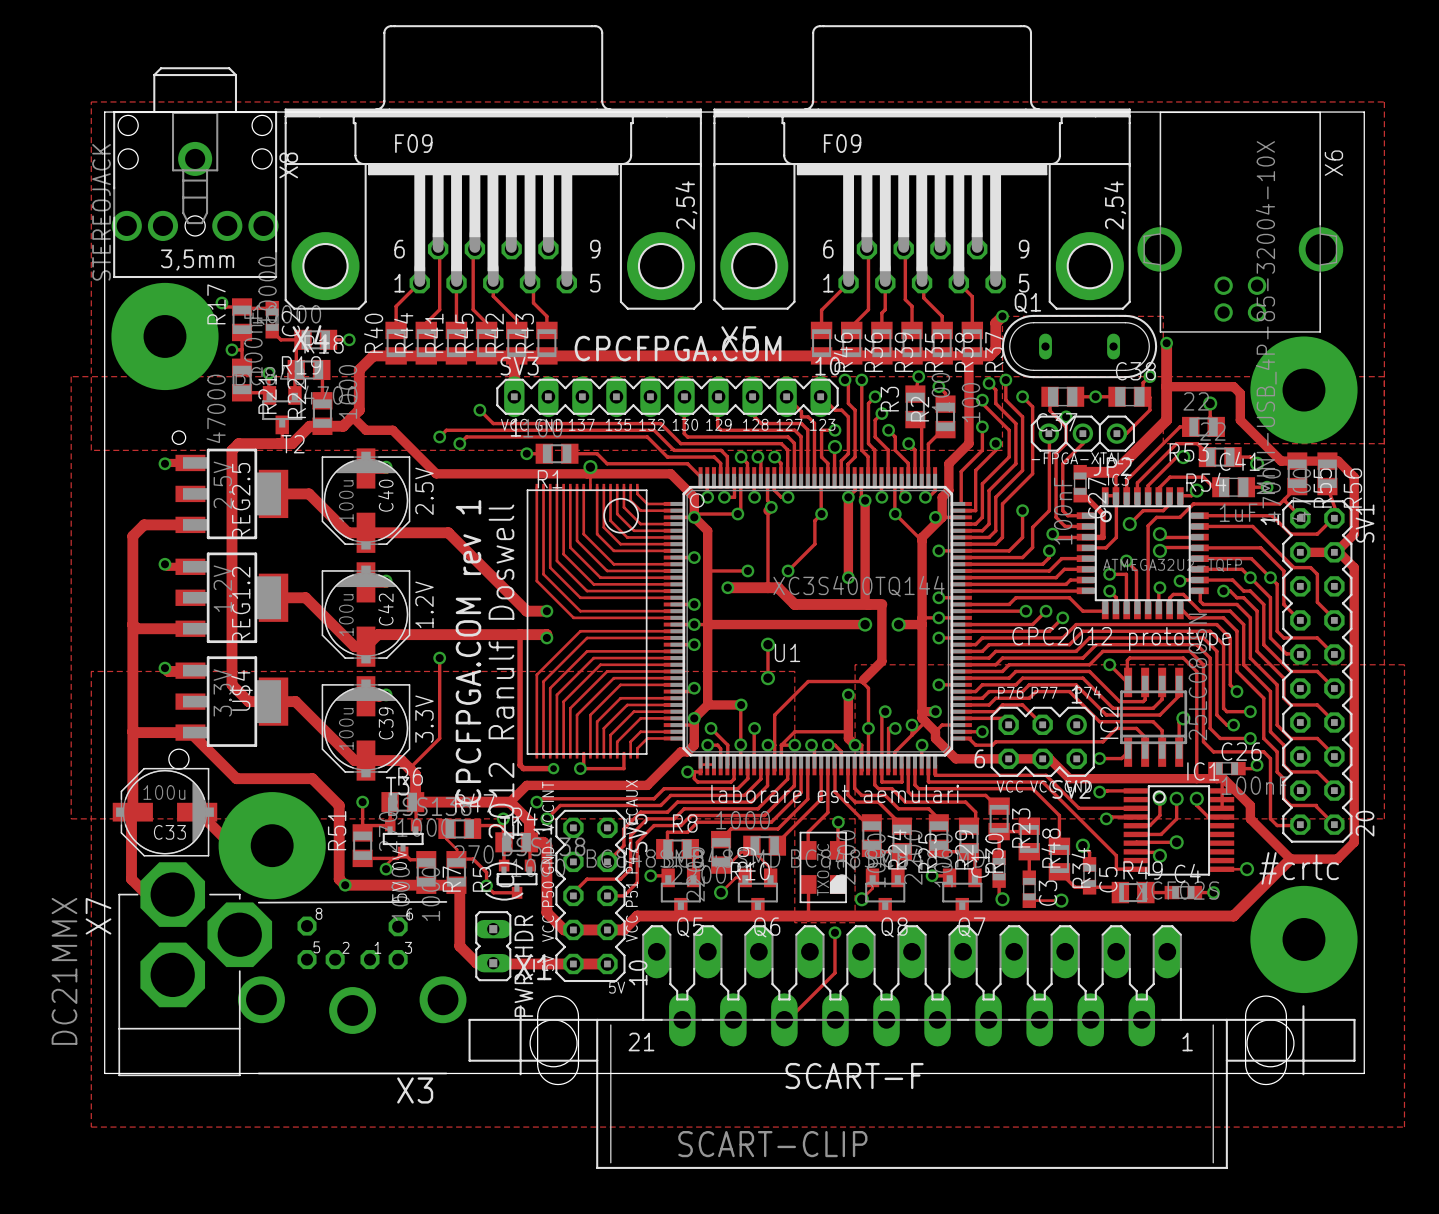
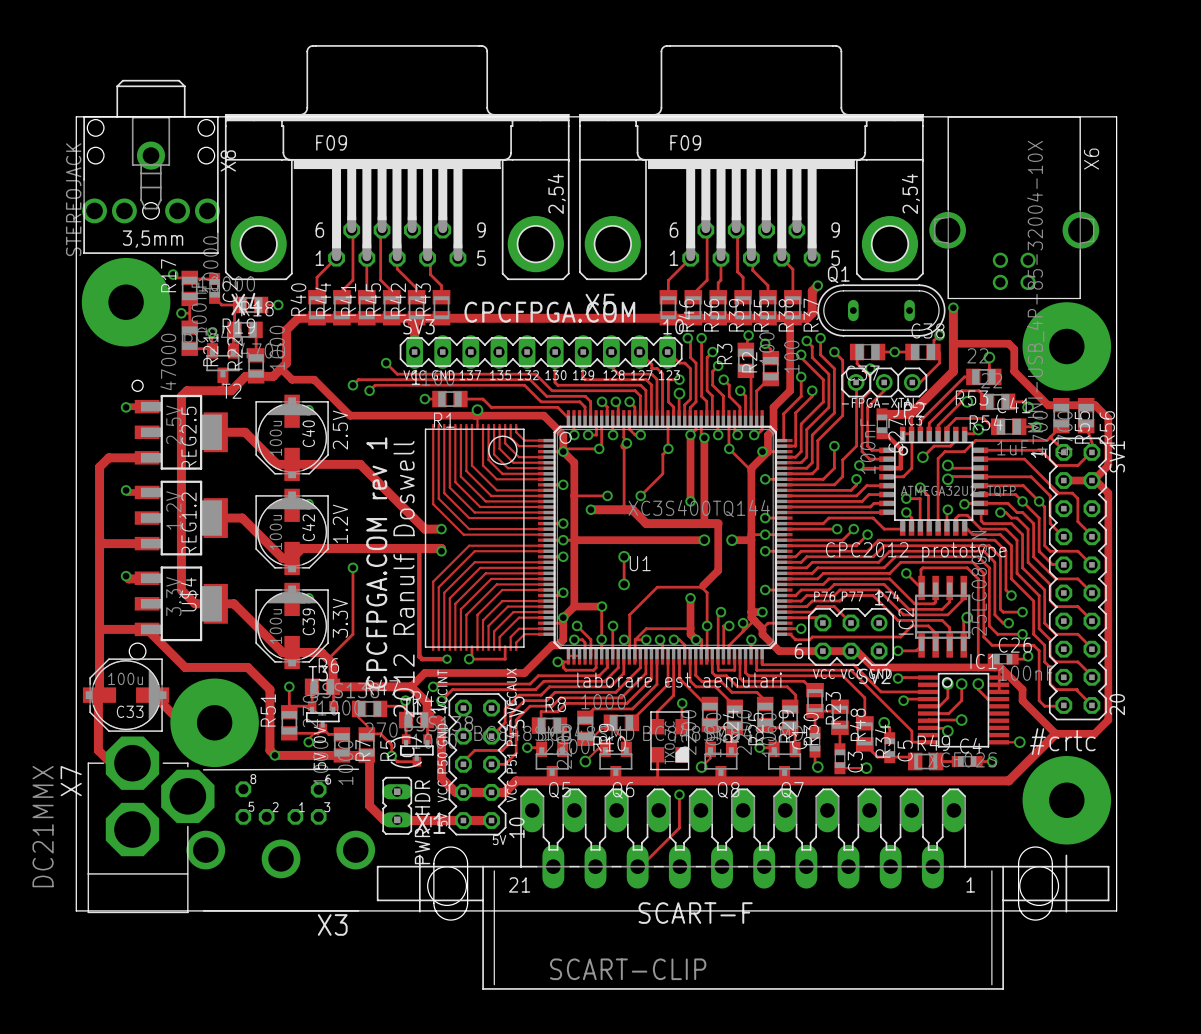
zone outline: (1384, 376) (71, 376) (71, 818) (1384, 818) (1384, 101) (91, 101) (91, 450) (1002, 450) (1002, 316) (1163, 316) (1163, 443) (1384, 443) -> none
zone outline: (855, 664) (1404, 664) (1404, 1127) (91, 1127) (91, 671) (794, 671) (794, 922) (855, 922) (855, 664) -> none

